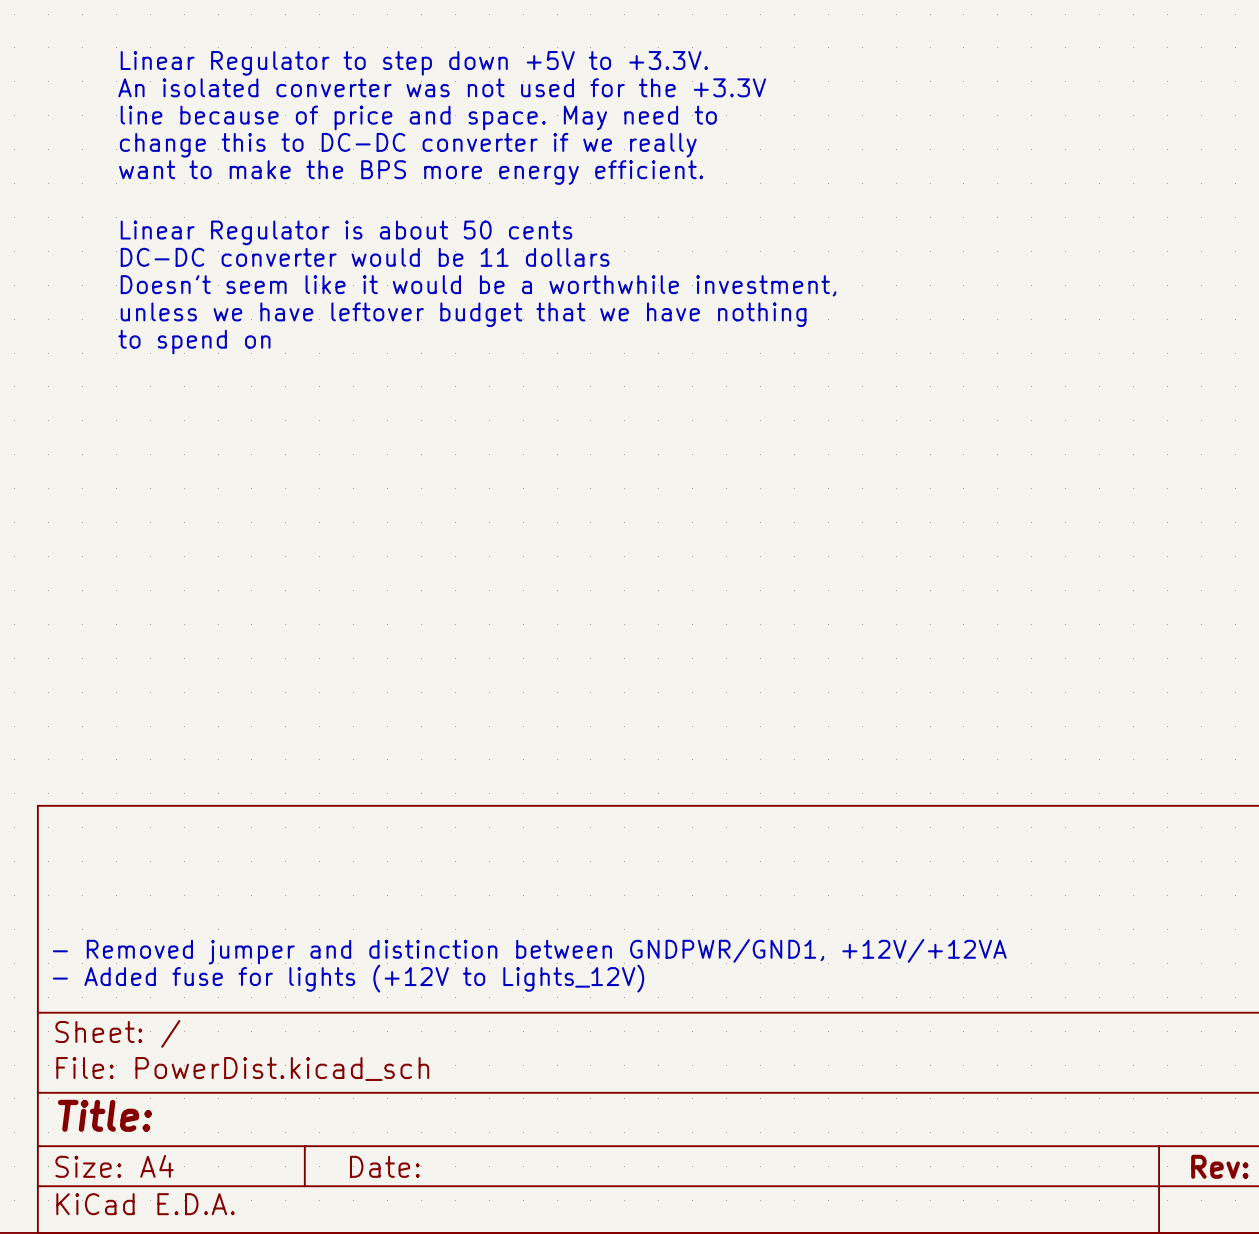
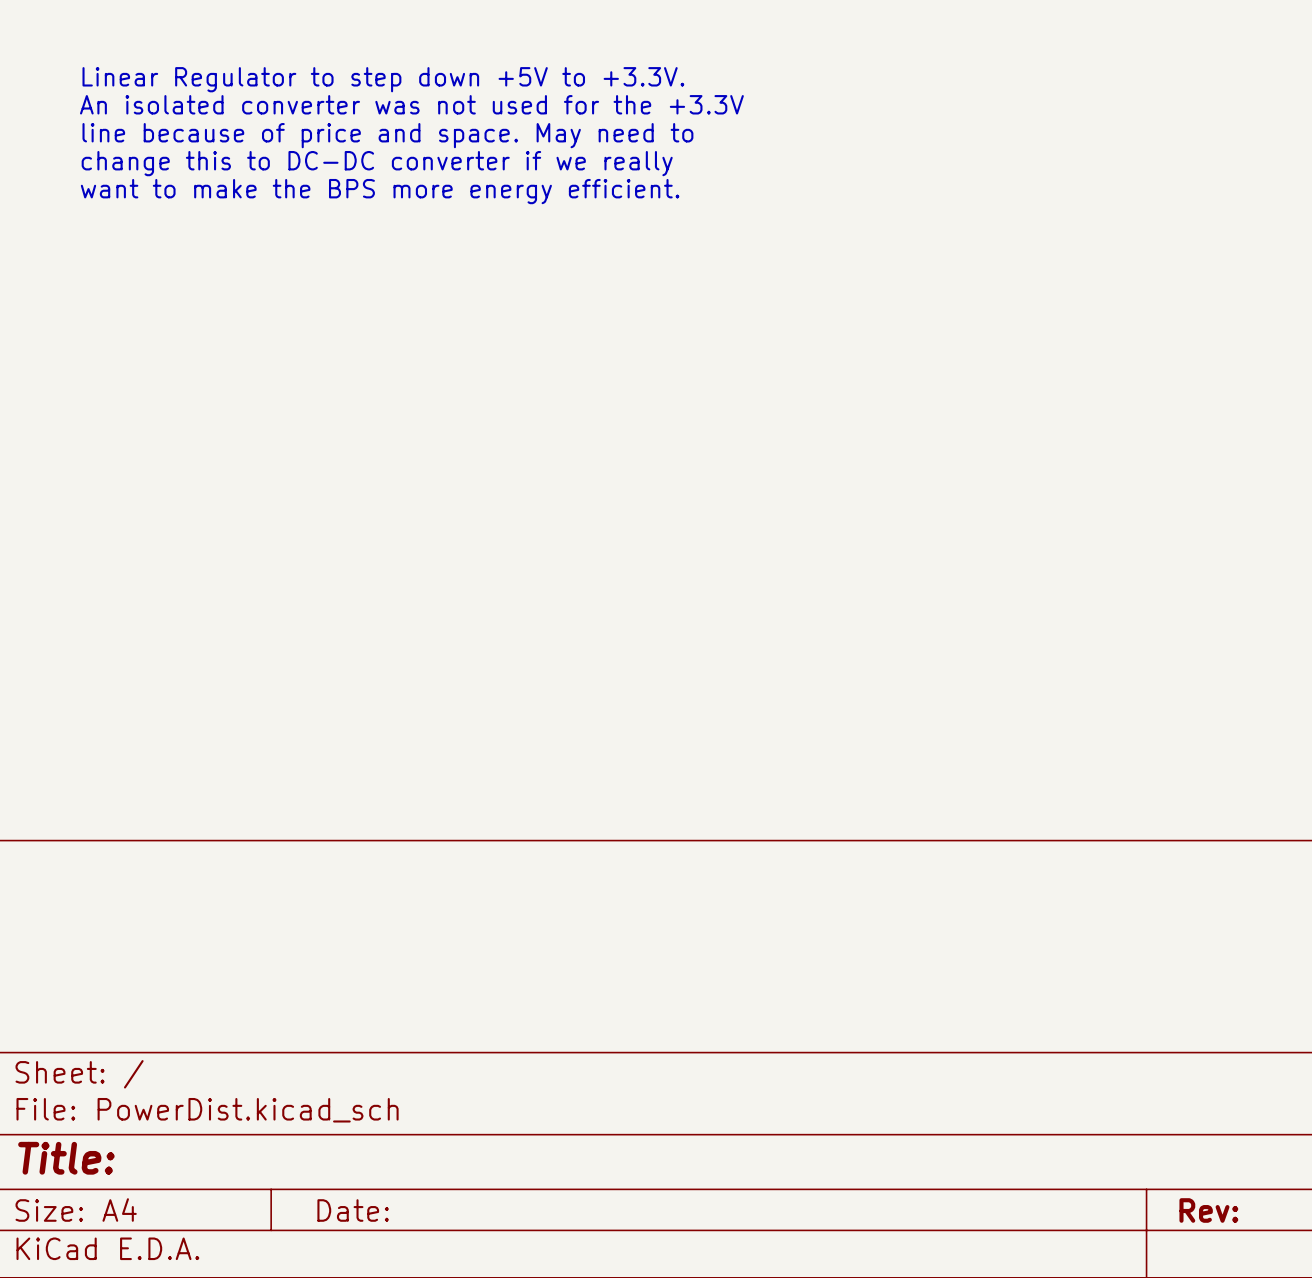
text: Linear Regulator is about 50 cents (346, 232) -> none
text: DC-DC converter would be 11 dollars (365, 257) -> none
text: Doesn't seem like it would be a worthwhile investment, (478, 285) -> none
text: unless we have leftover budget that we have nothing (463, 314) -> none
text: to spend on (194, 342) -> none
text: - Removed jumper and distinction between GNDPWR/GND1, +12V/+12VA (529, 951) -> none
text: - Added fuse for lights (+12V to Lights_12V) (348, 978) -> none

